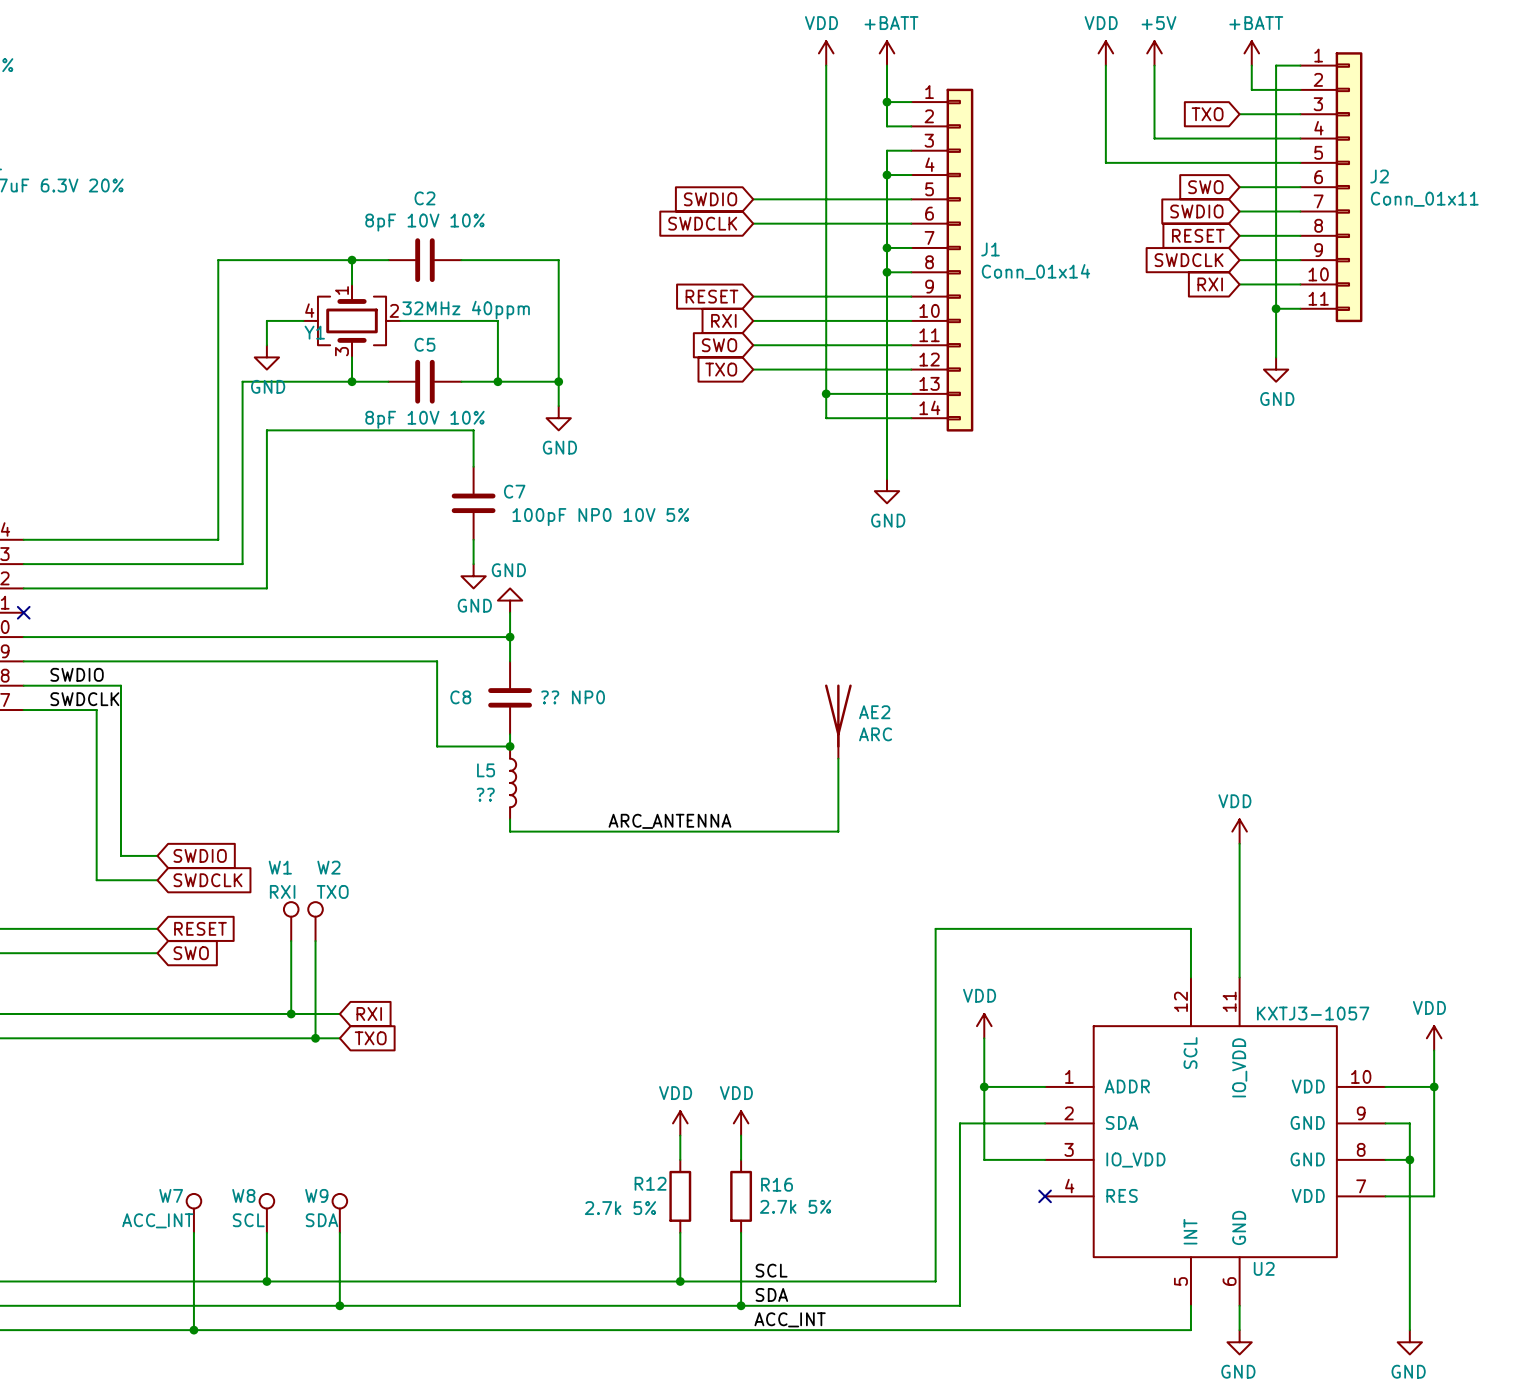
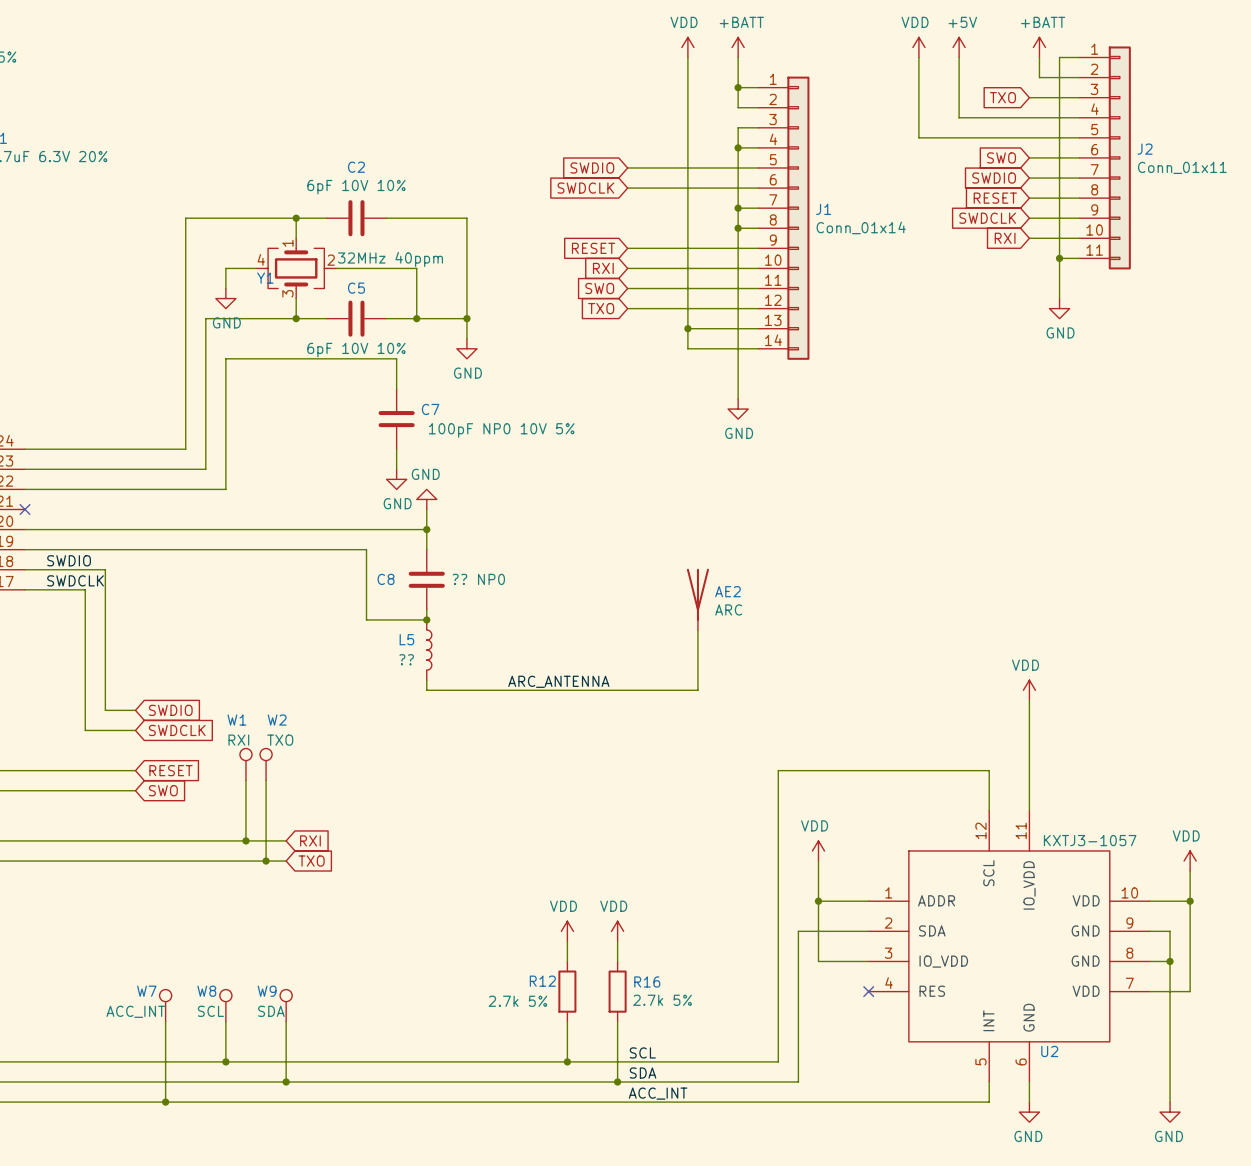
C2 value: 8pF 10V 10% (424, 222) -> 6pF 10V 10% (356, 187)
C5 value: 8pF 10V 10% (424, 419) -> 6pF 10V 10% (356, 350)

